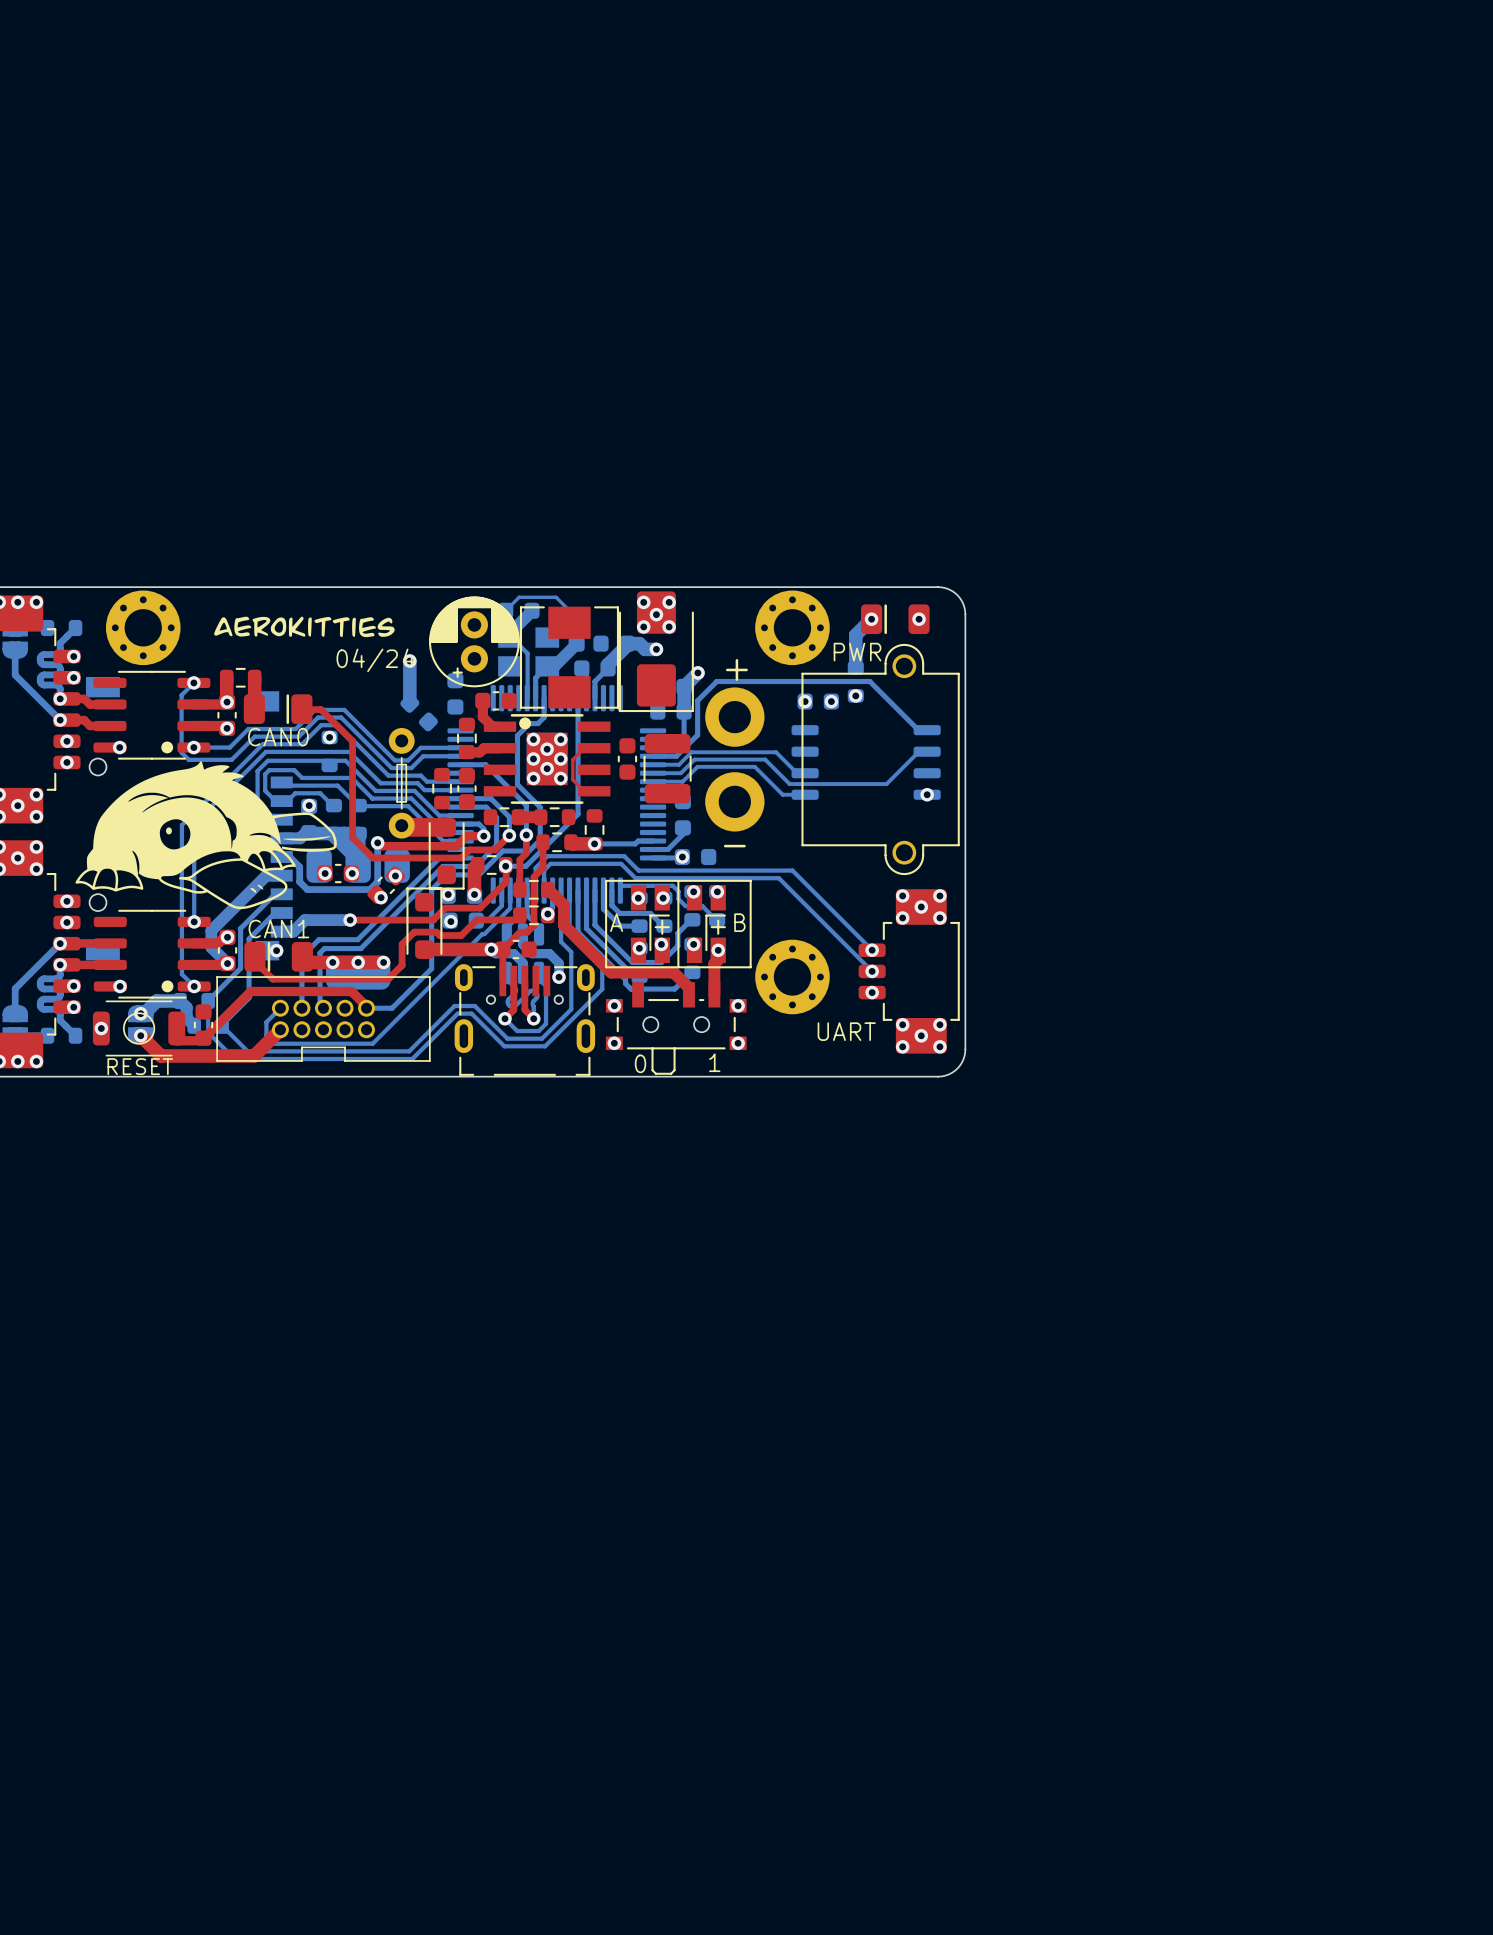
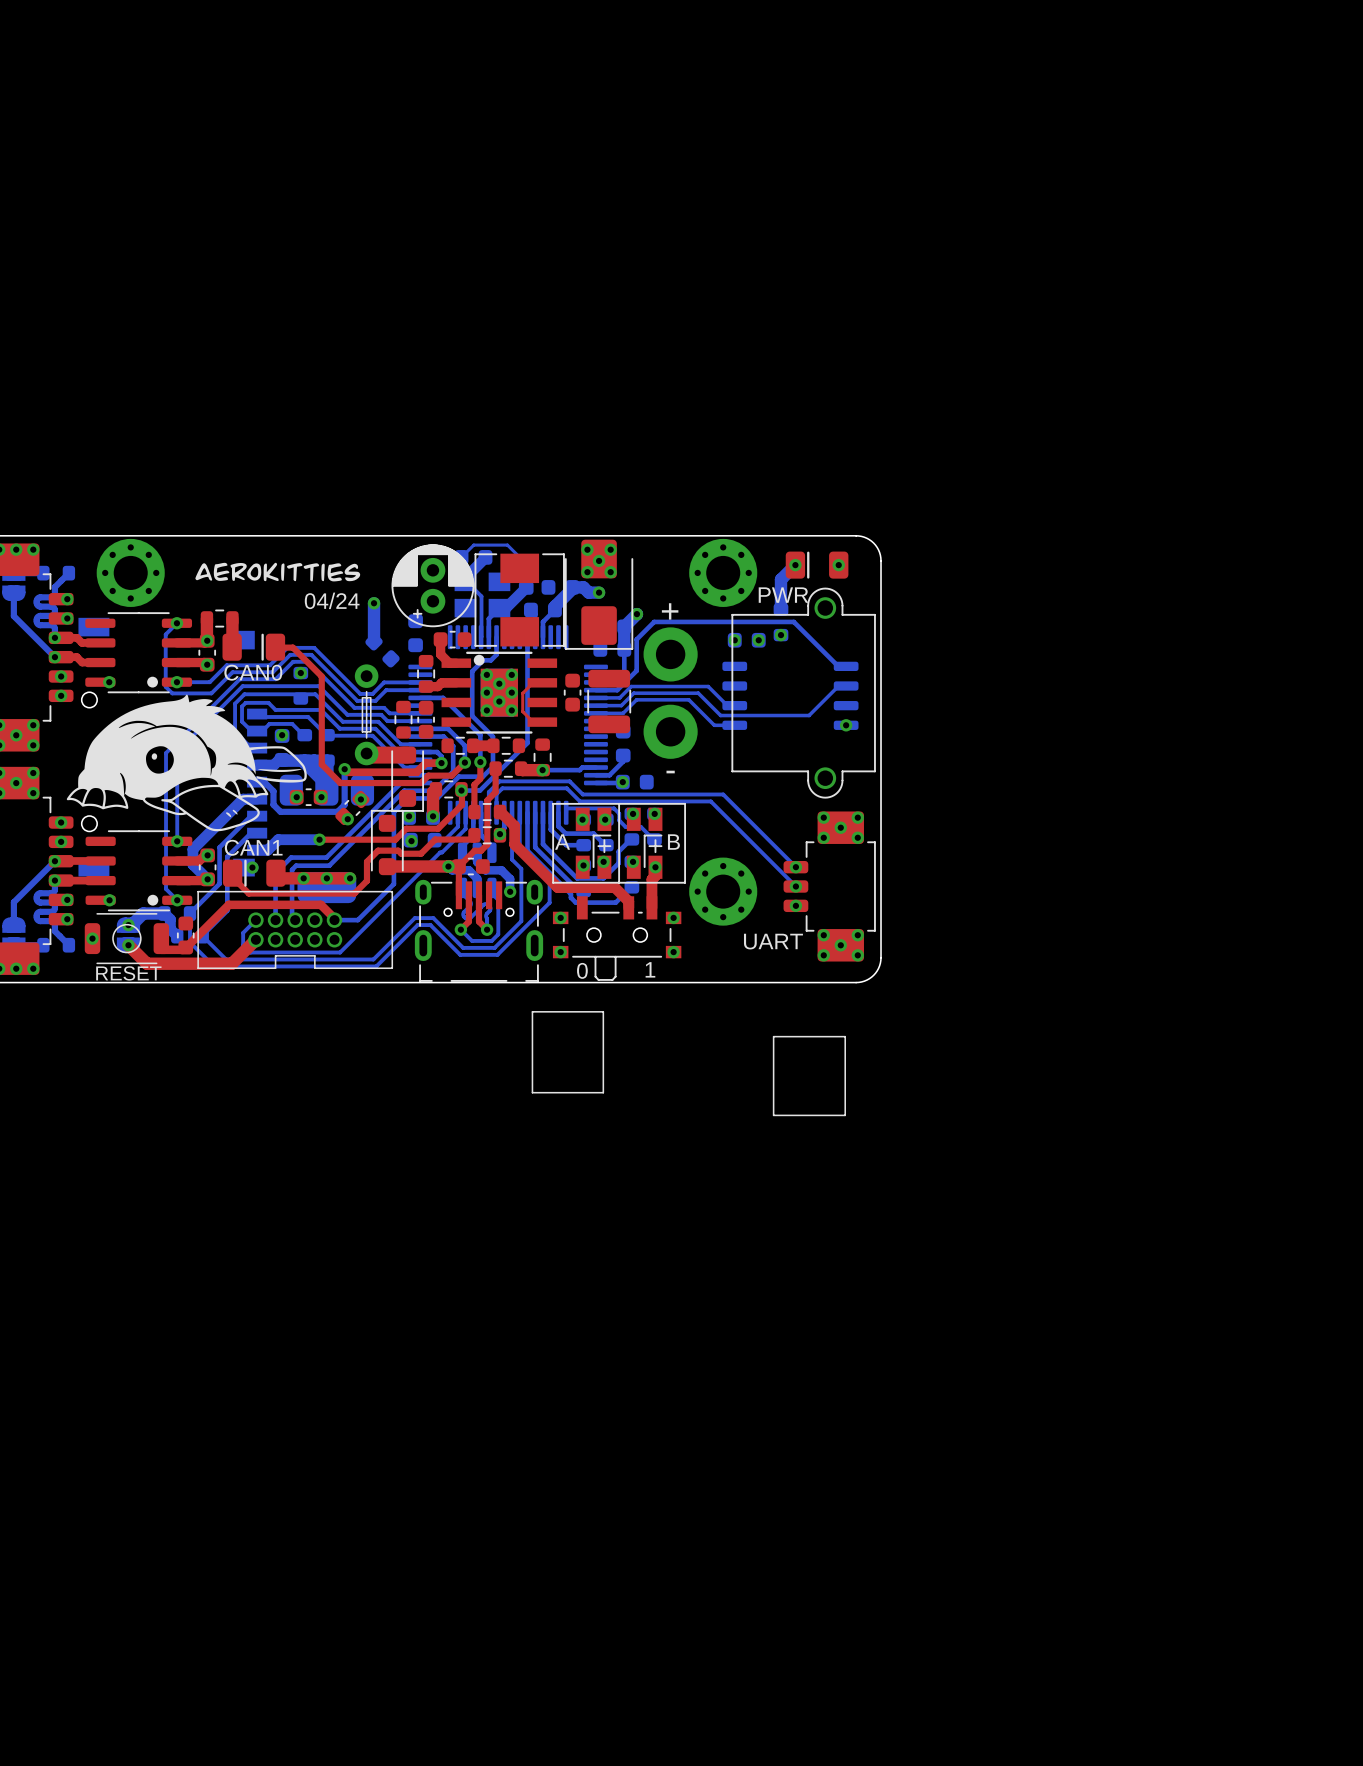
drawing shape: [75, 761, 337, 910] -> [66, 694, 307, 832]
line: none -> (532, 1011) (603, 1011) (603, 1092) (532, 1092) (532, 1011)
line: none -> (773, 1036) (845, 1036) (845, 1115) (773, 1115) (773, 1036)

